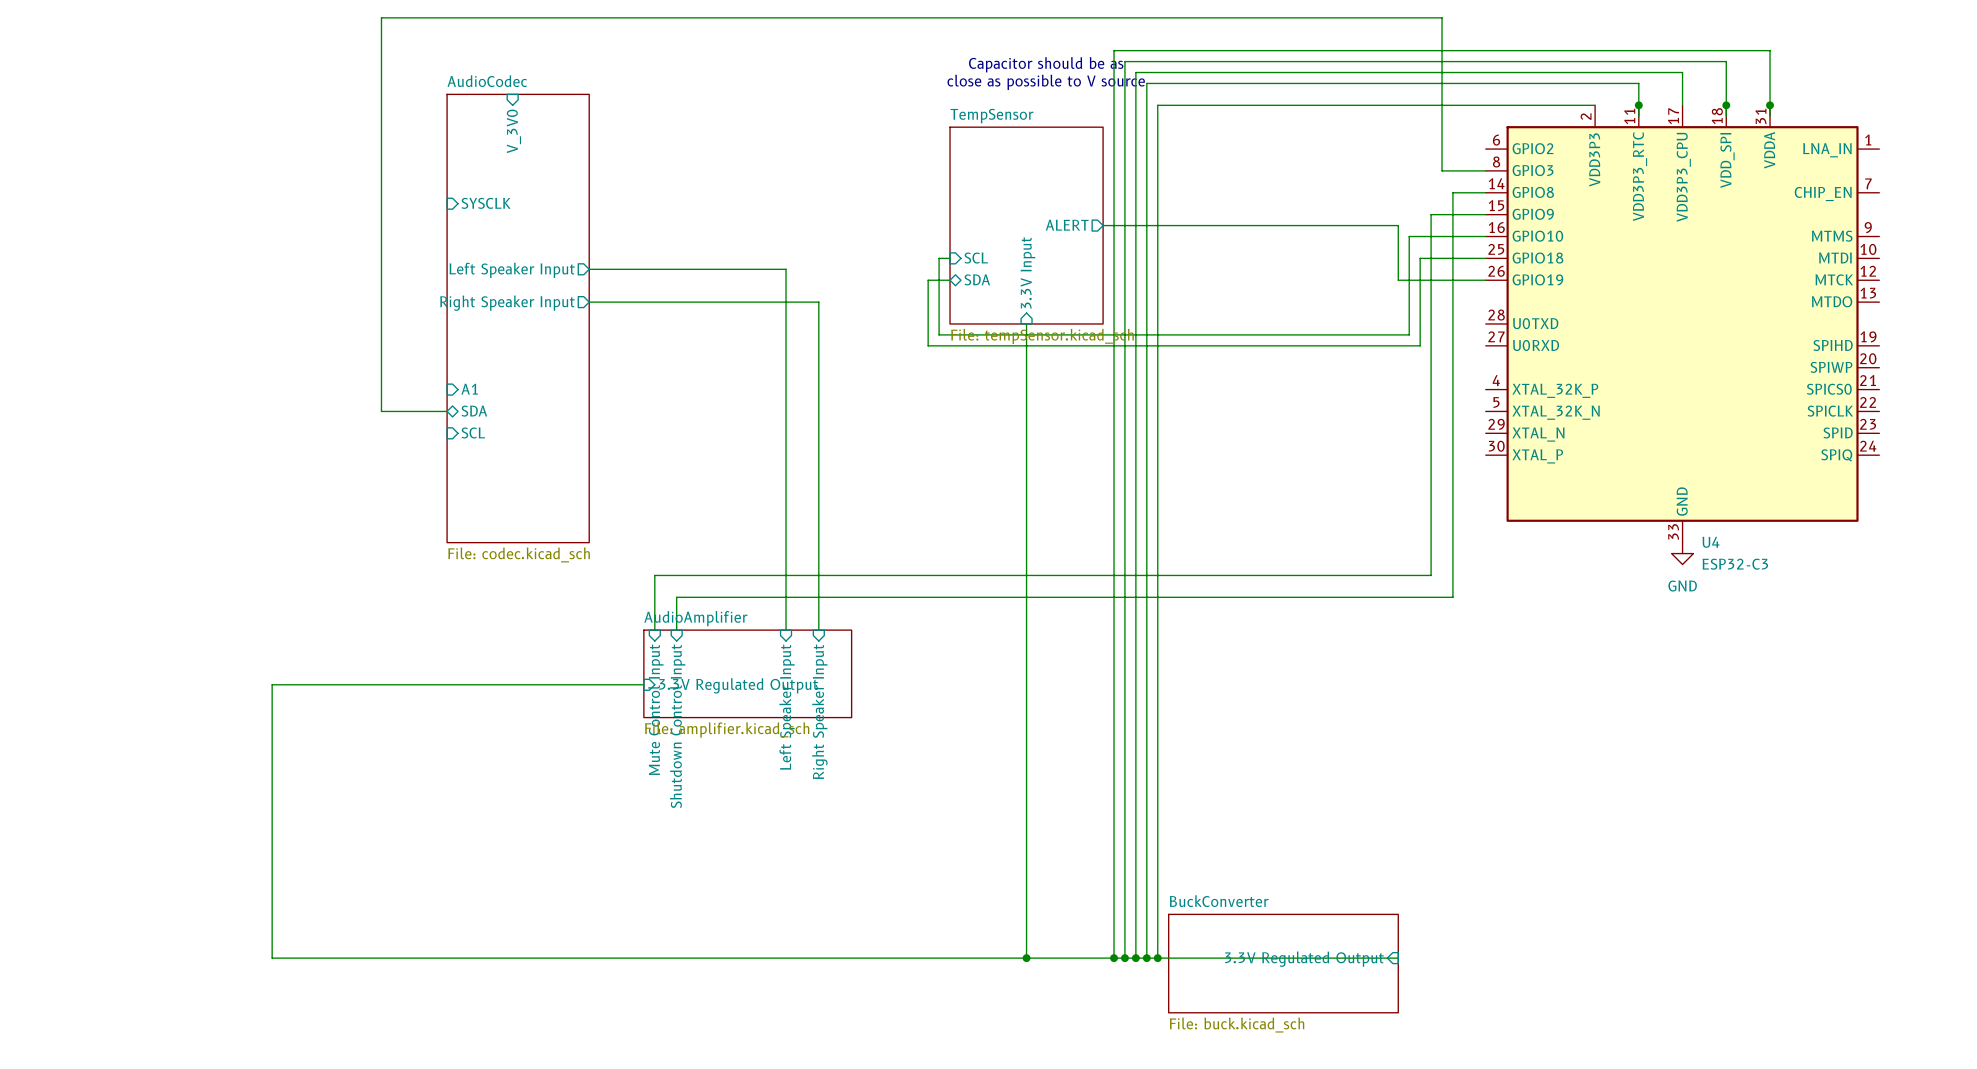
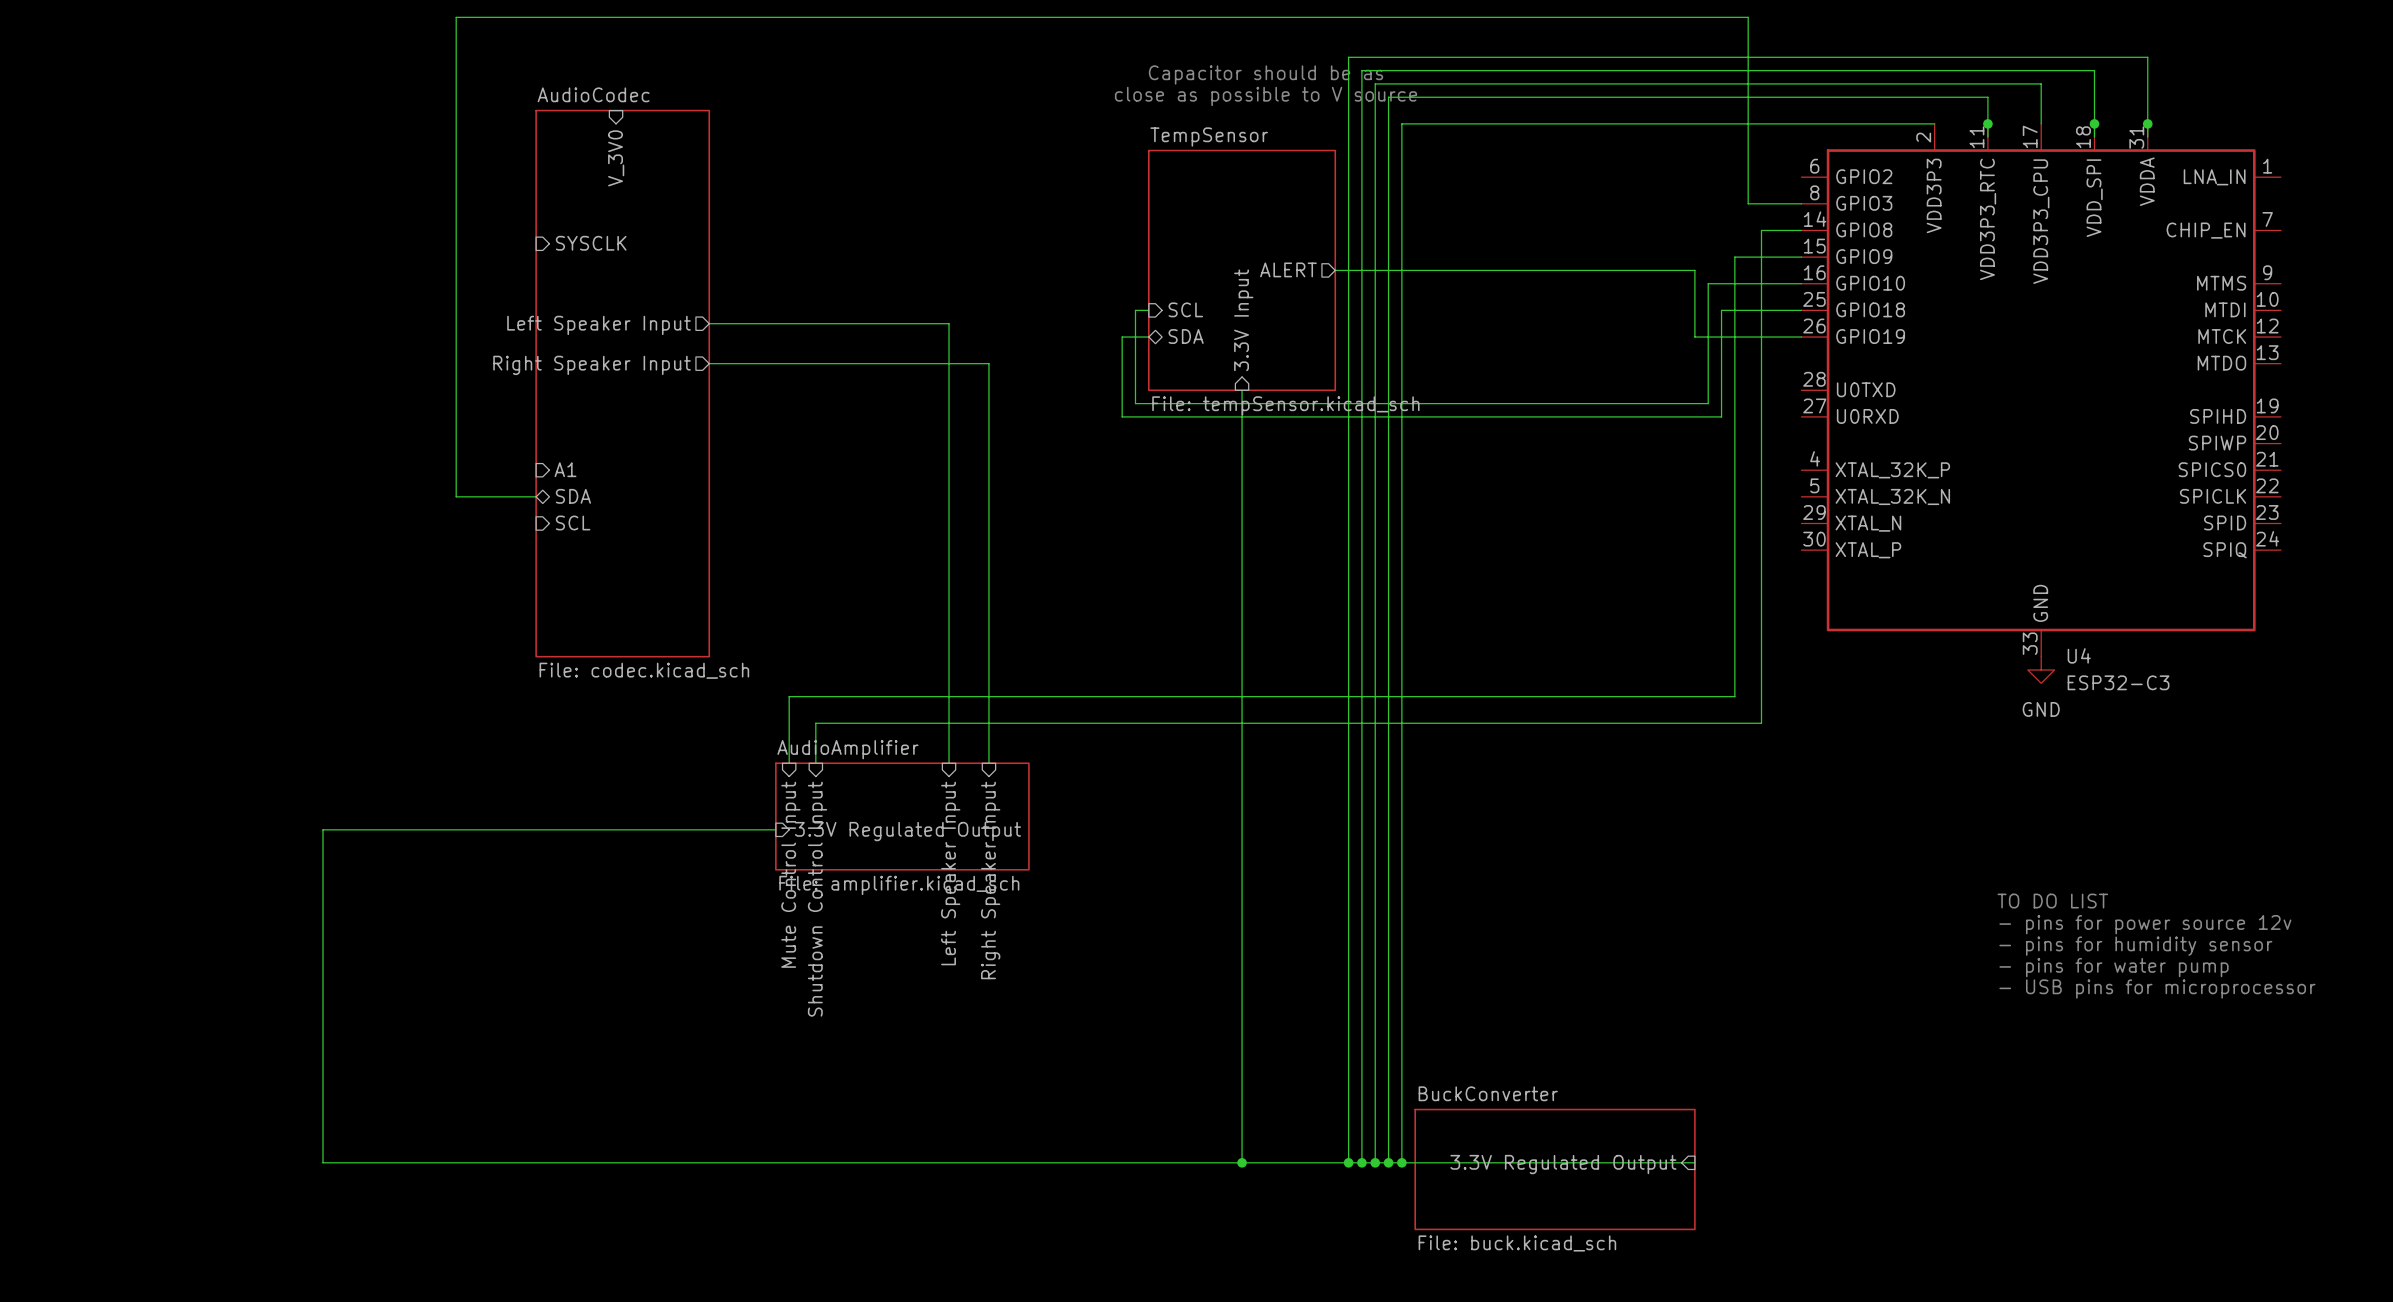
text: none -> TO DO LIST (2052, 901)
text: none -> - pins for power source 12v (2145, 924)
text: none -> - pins for humidity sensor (2135, 946)
text: none -> - pins for water pump (2113, 967)
text: none -> - USB pins for microprocessor (2157, 989)

